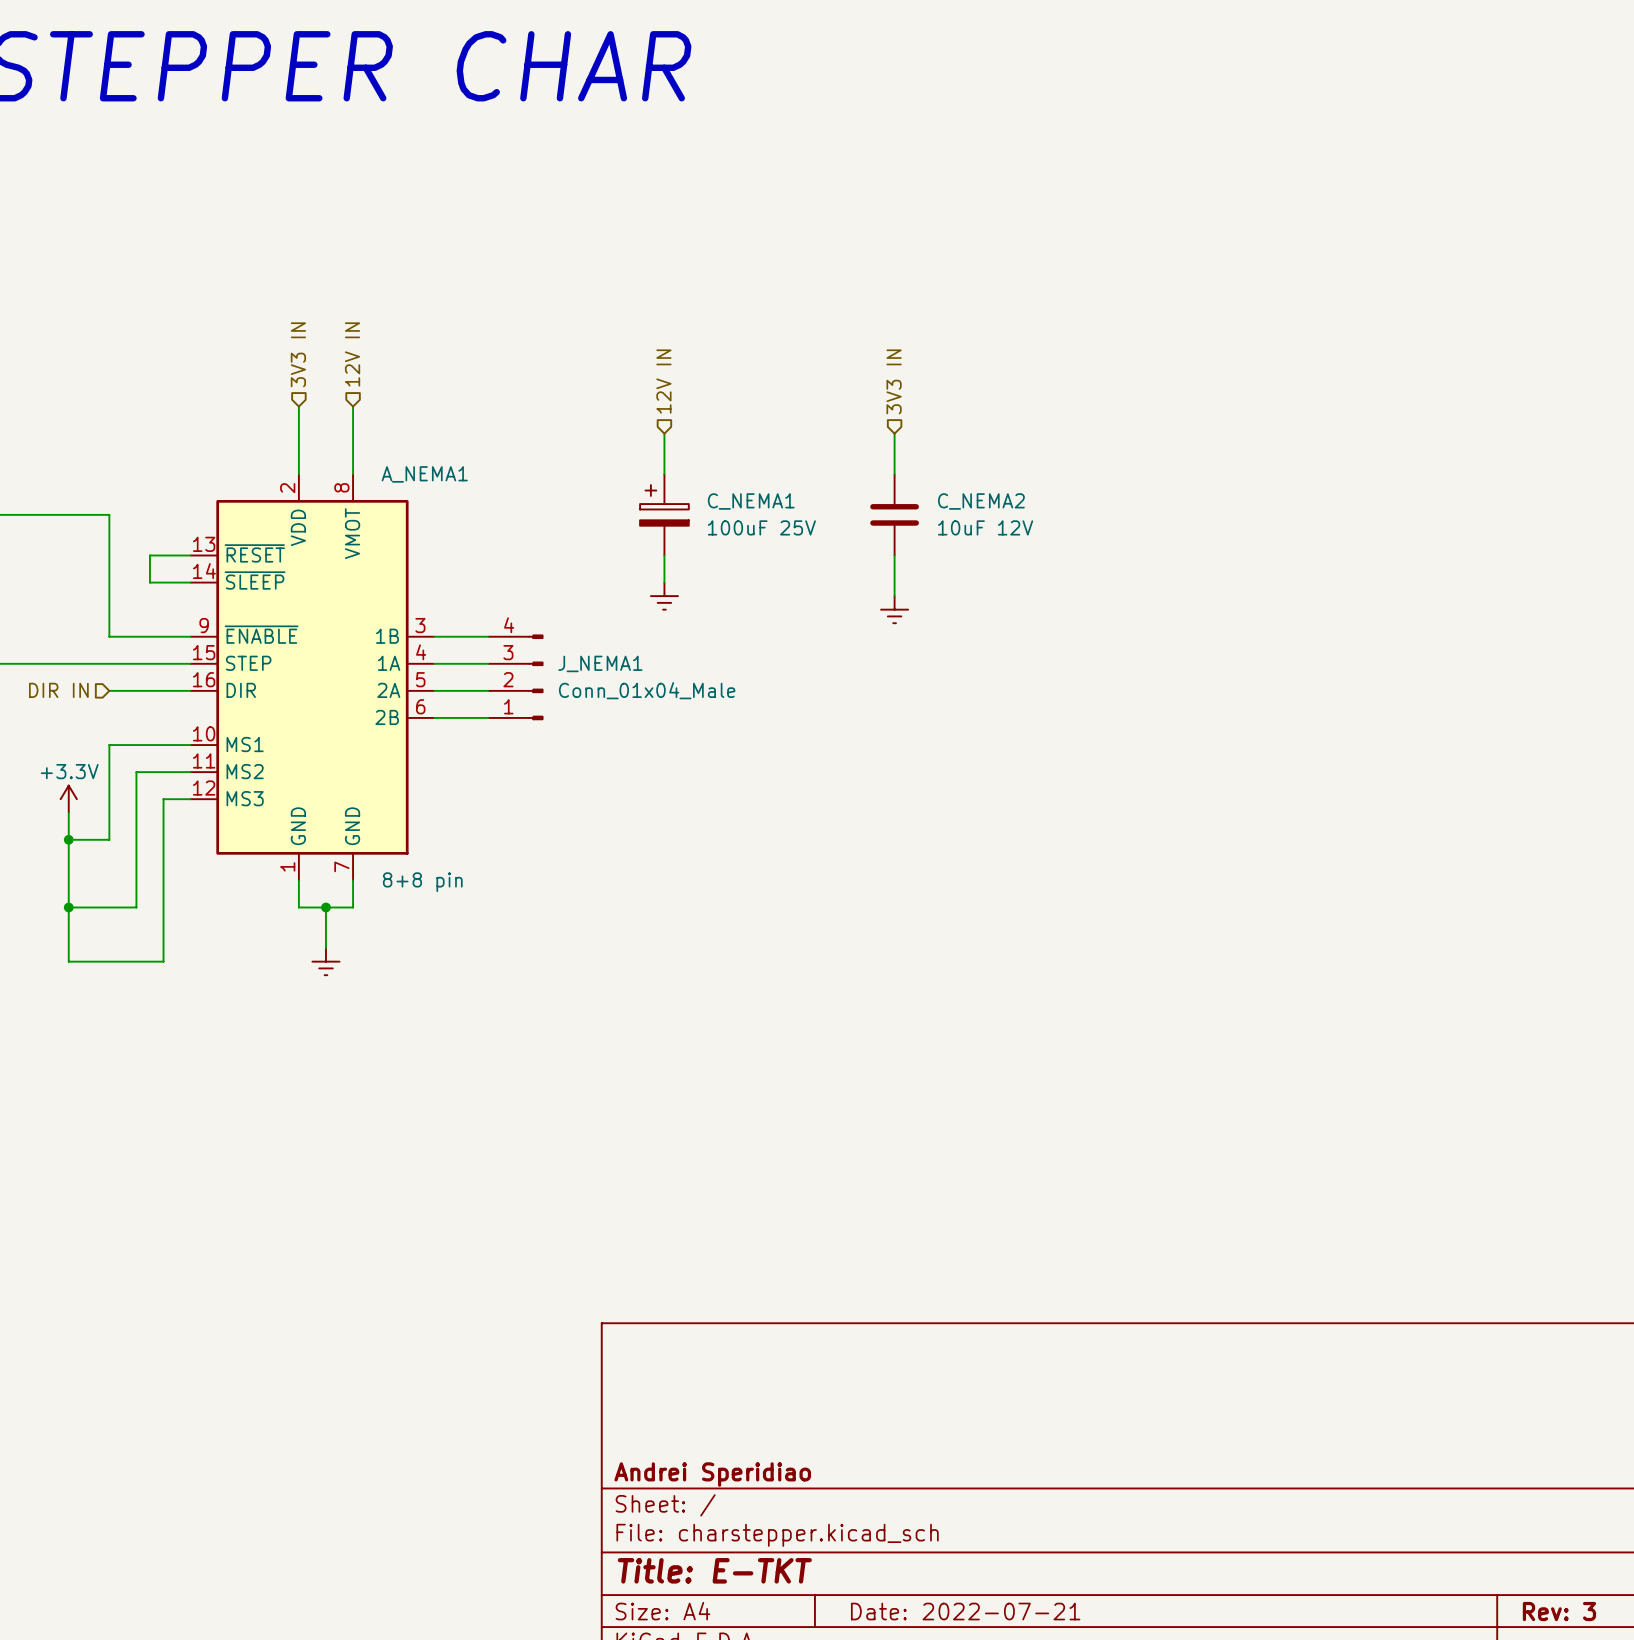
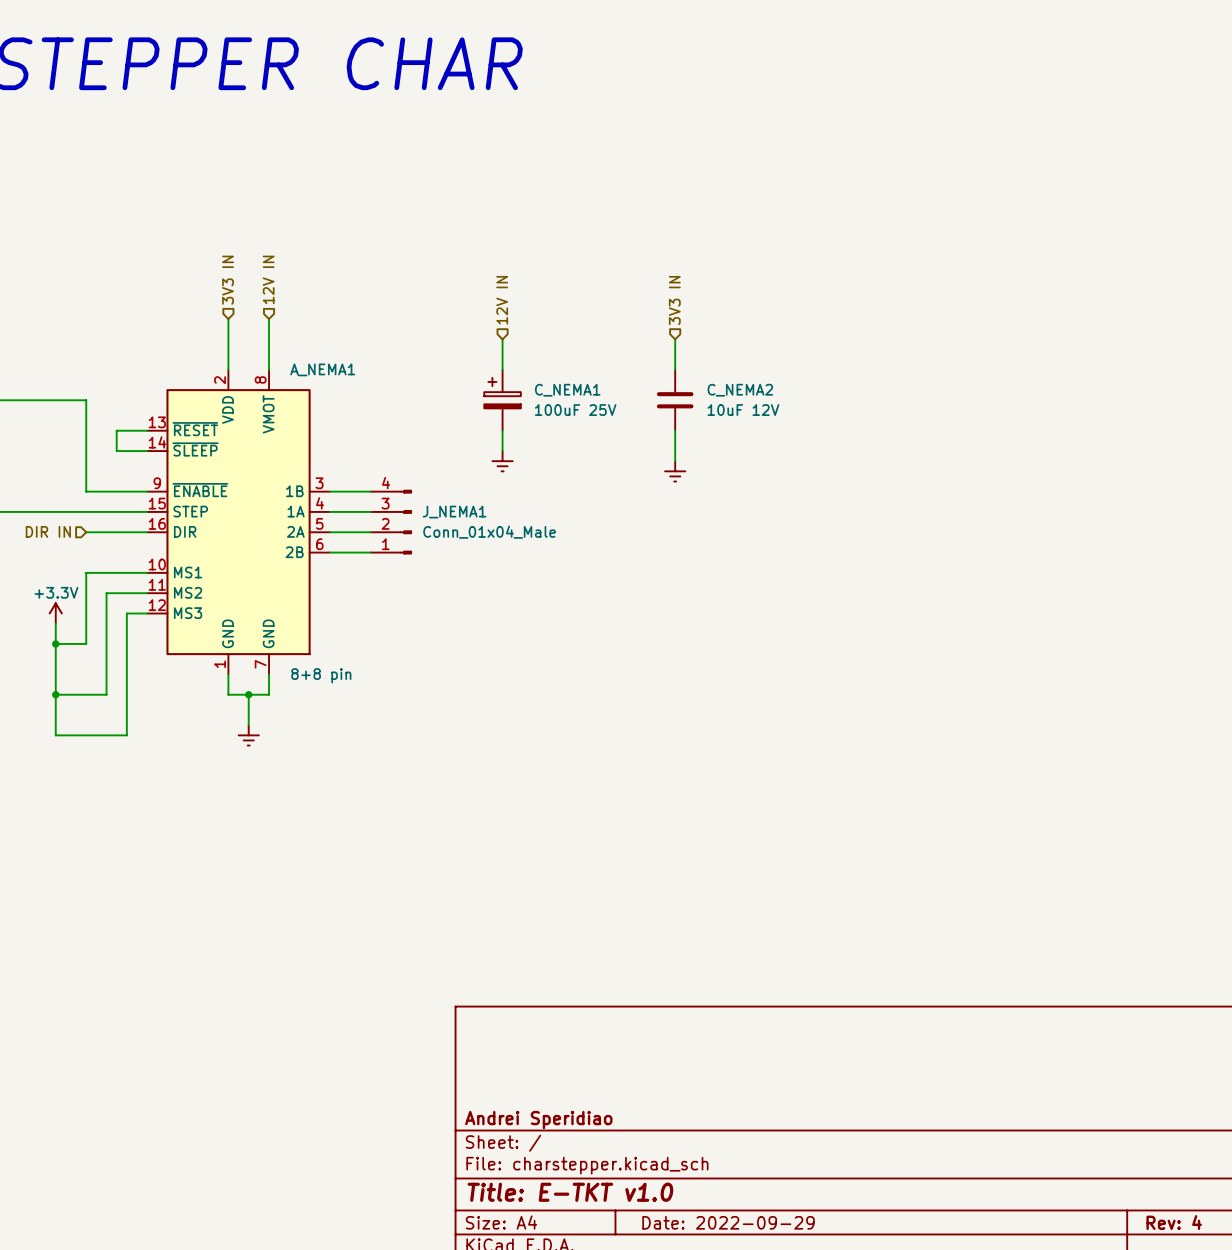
title block: Title: E-TKT (714, 1570) -> Title: E-TKT v1.0 (570, 1192)
title block: Date: 2022-07-21 (965, 1611) -> Date: 2022-09-29 (728, 1222)
title block: Rev: 3 (1559, 1611) -> Rev: 4 (1174, 1222)

